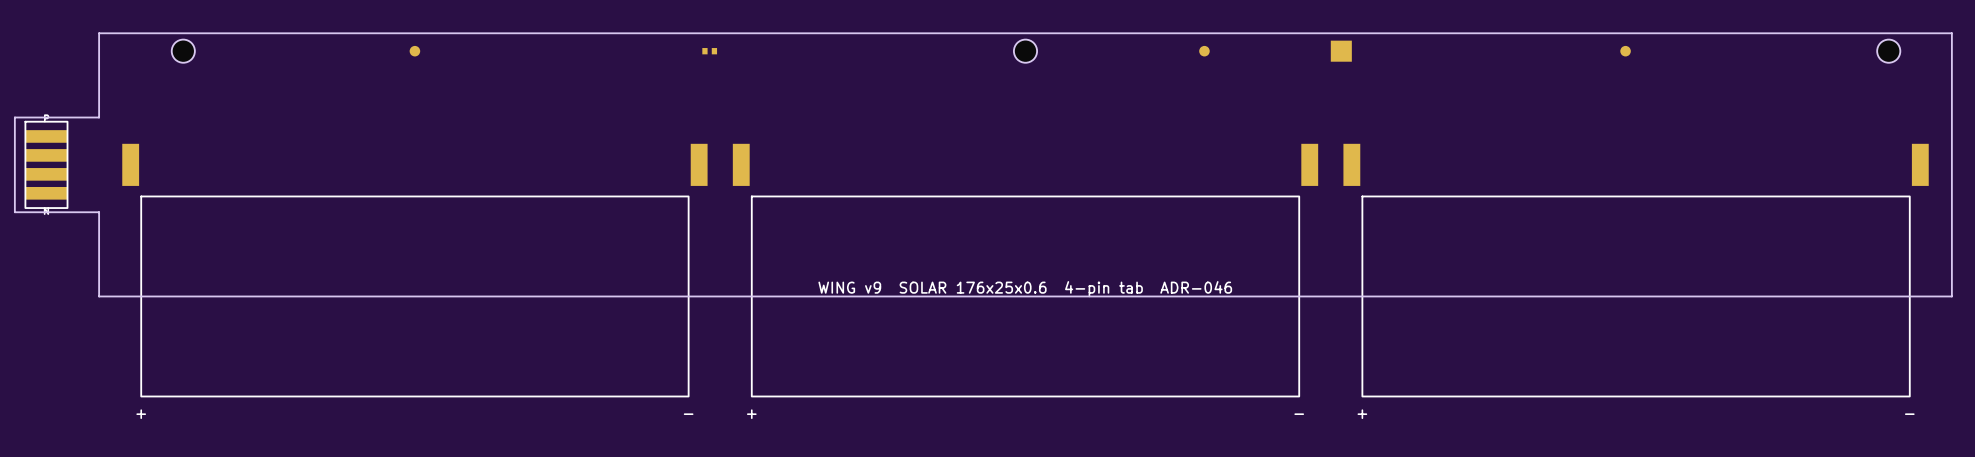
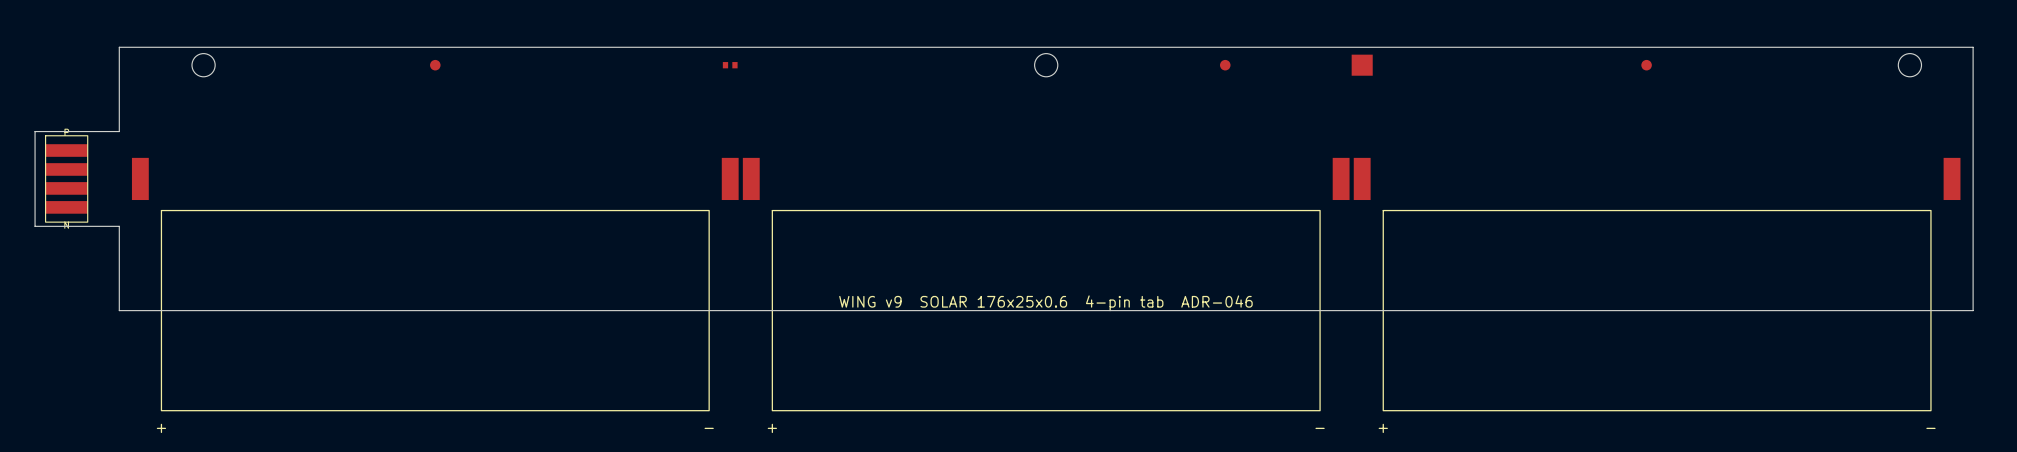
part footprint: [122, 143, 708, 398] -> [131, 157, 739, 412]
part footprint: [732, 143, 1319, 398] -> [742, 157, 1350, 412]
part footprint: [1343, 143, 1929, 398] -> [1353, 157, 1961, 412]

